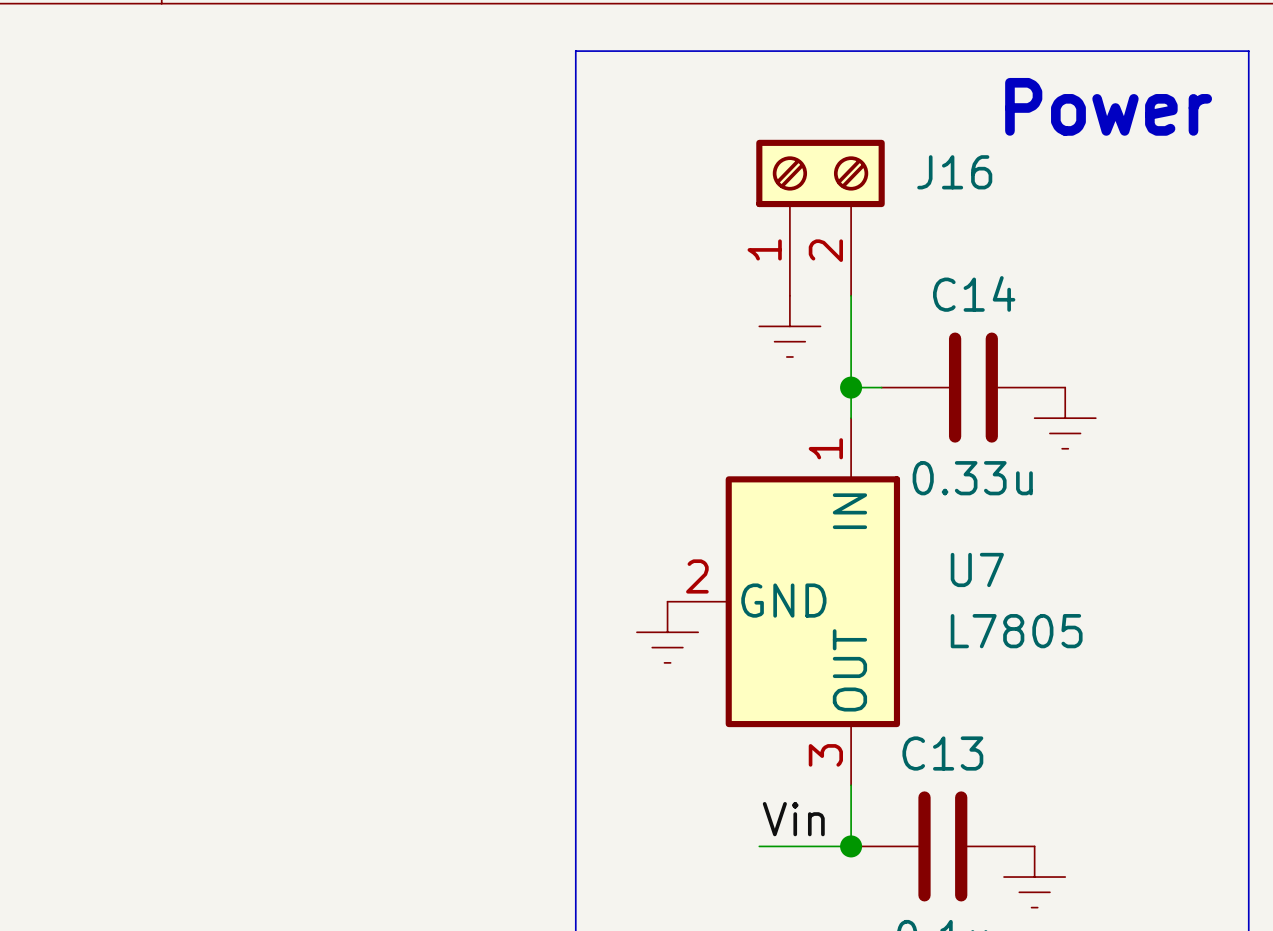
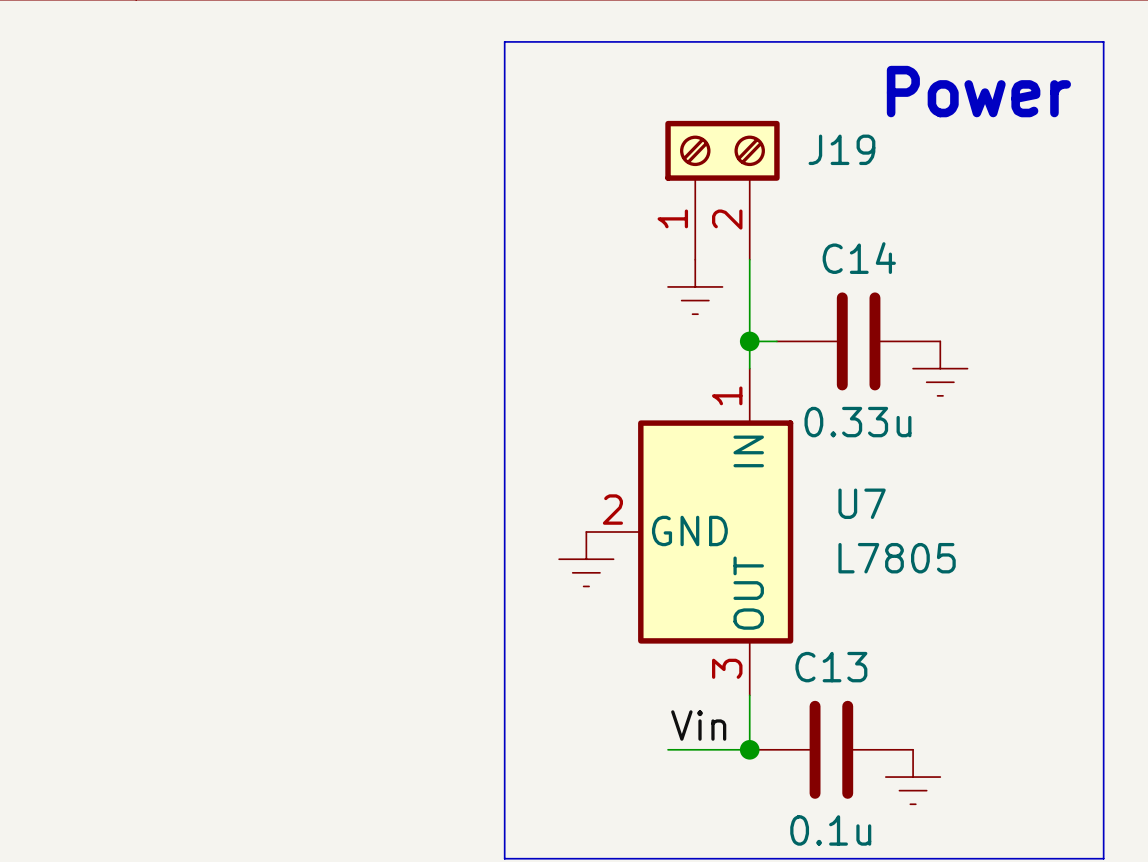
J16 name: J16 (954, 172) -> J19 (841, 149)

